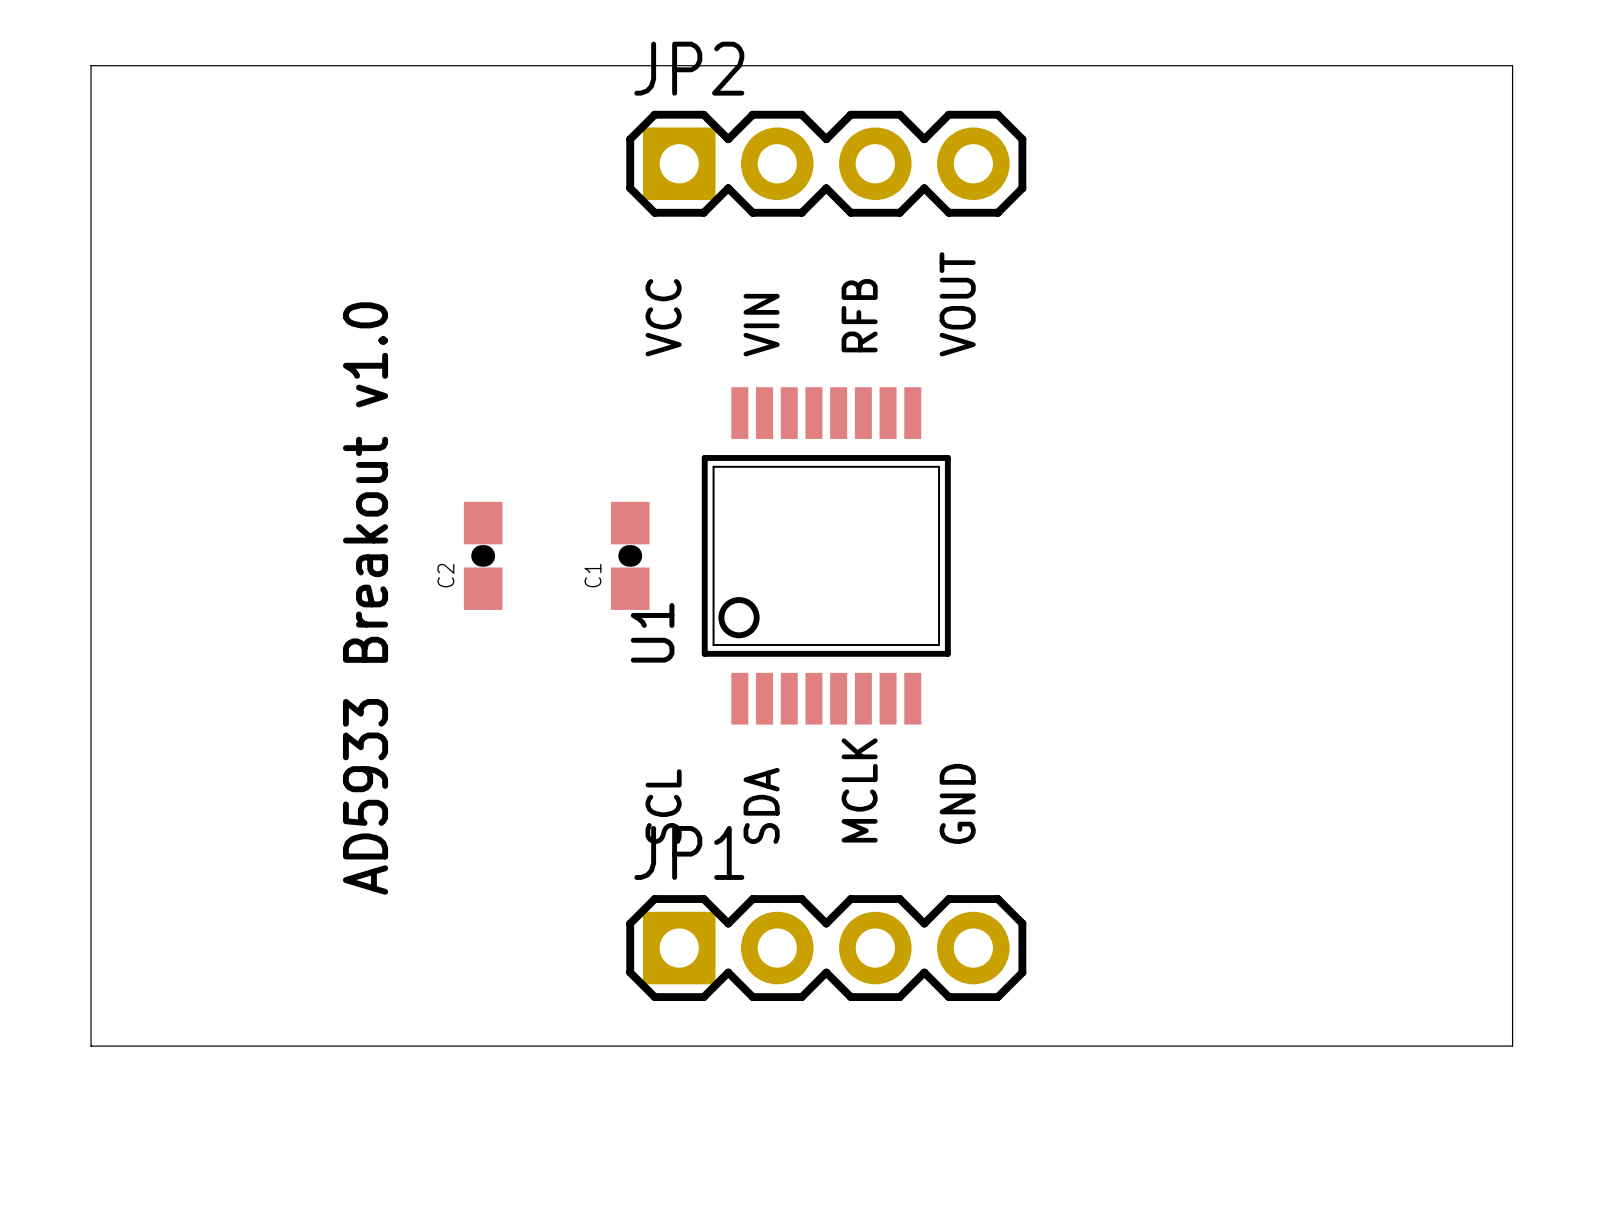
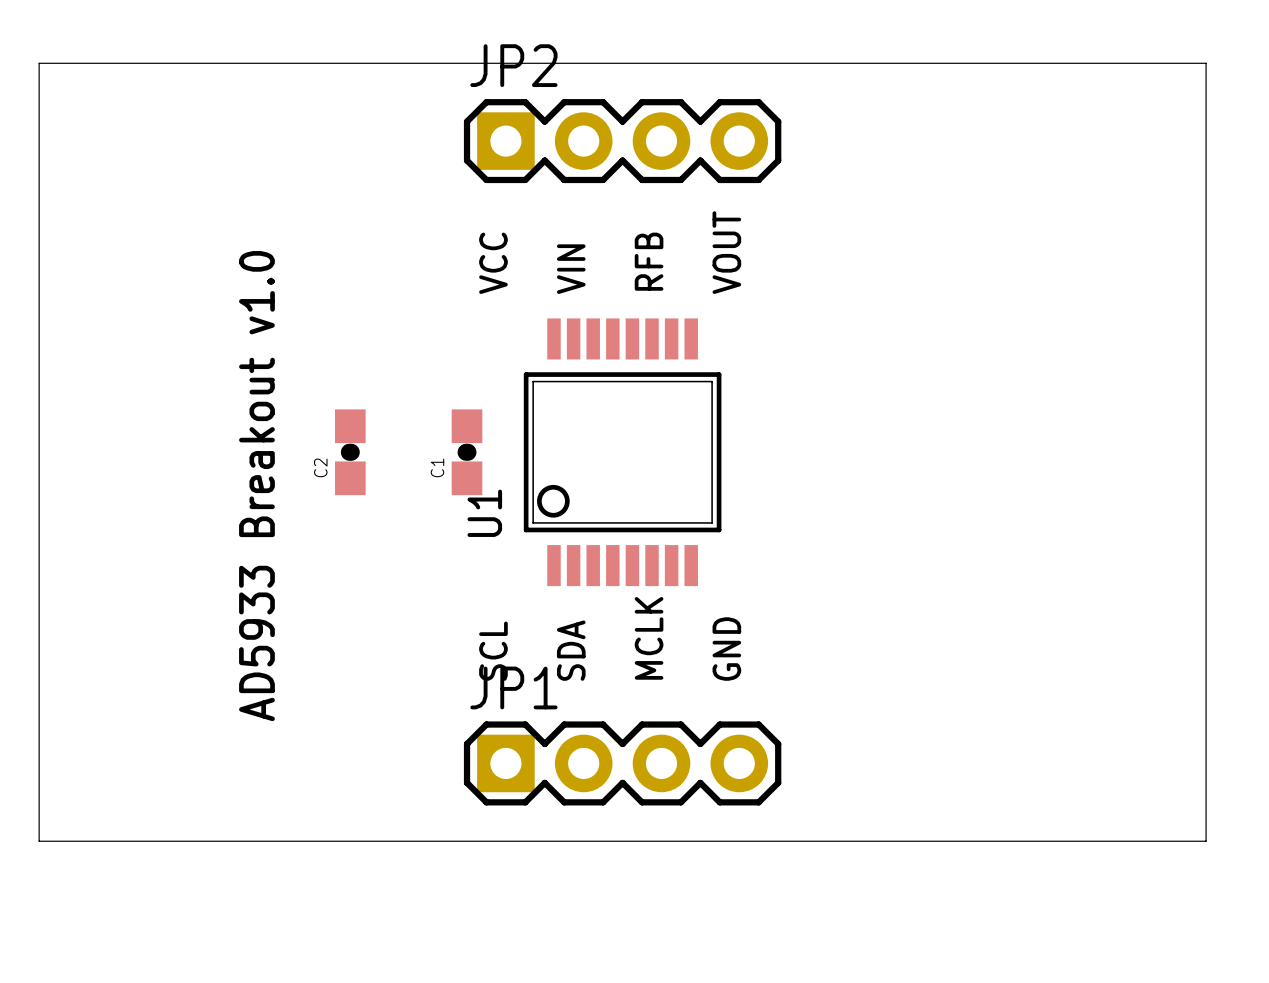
board edge: (1512, 65) (1512, 1046) -> (1167, 63) (1206, 63) (1206, 841) (1167, 841)

